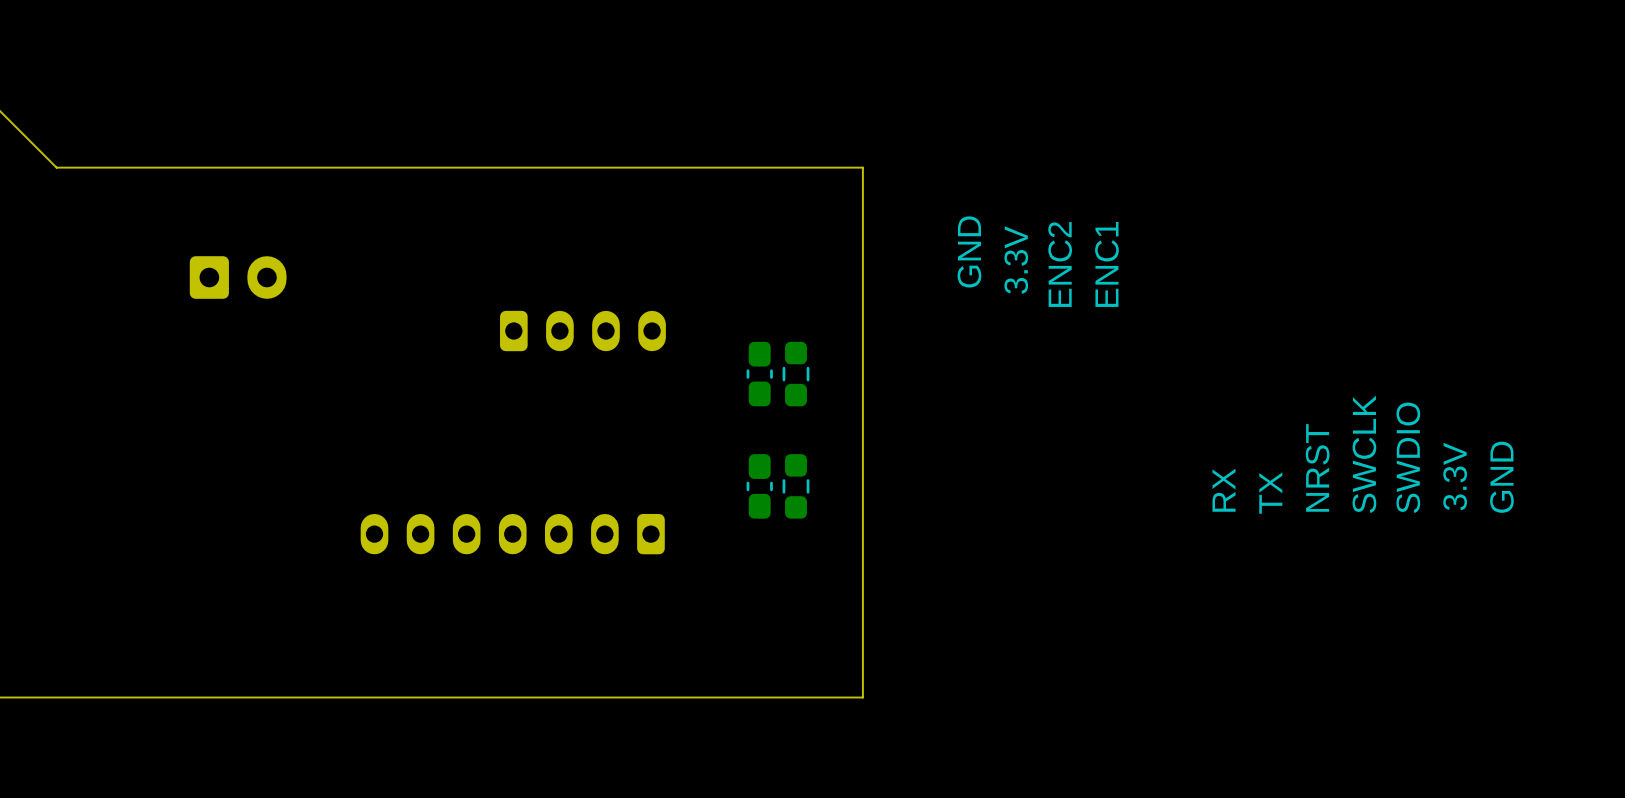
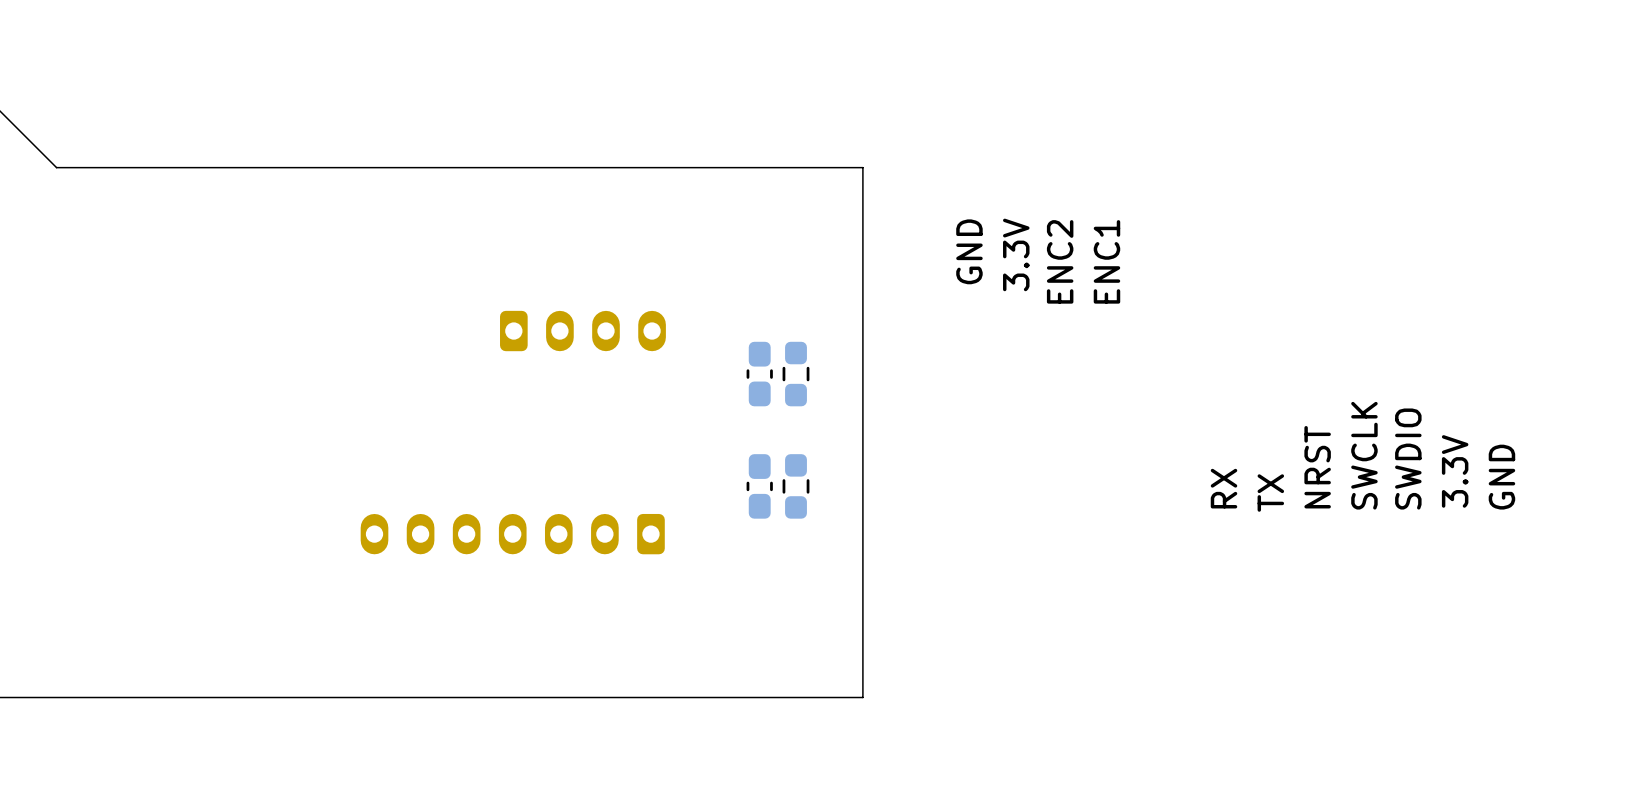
part: (238, 277) -> none

